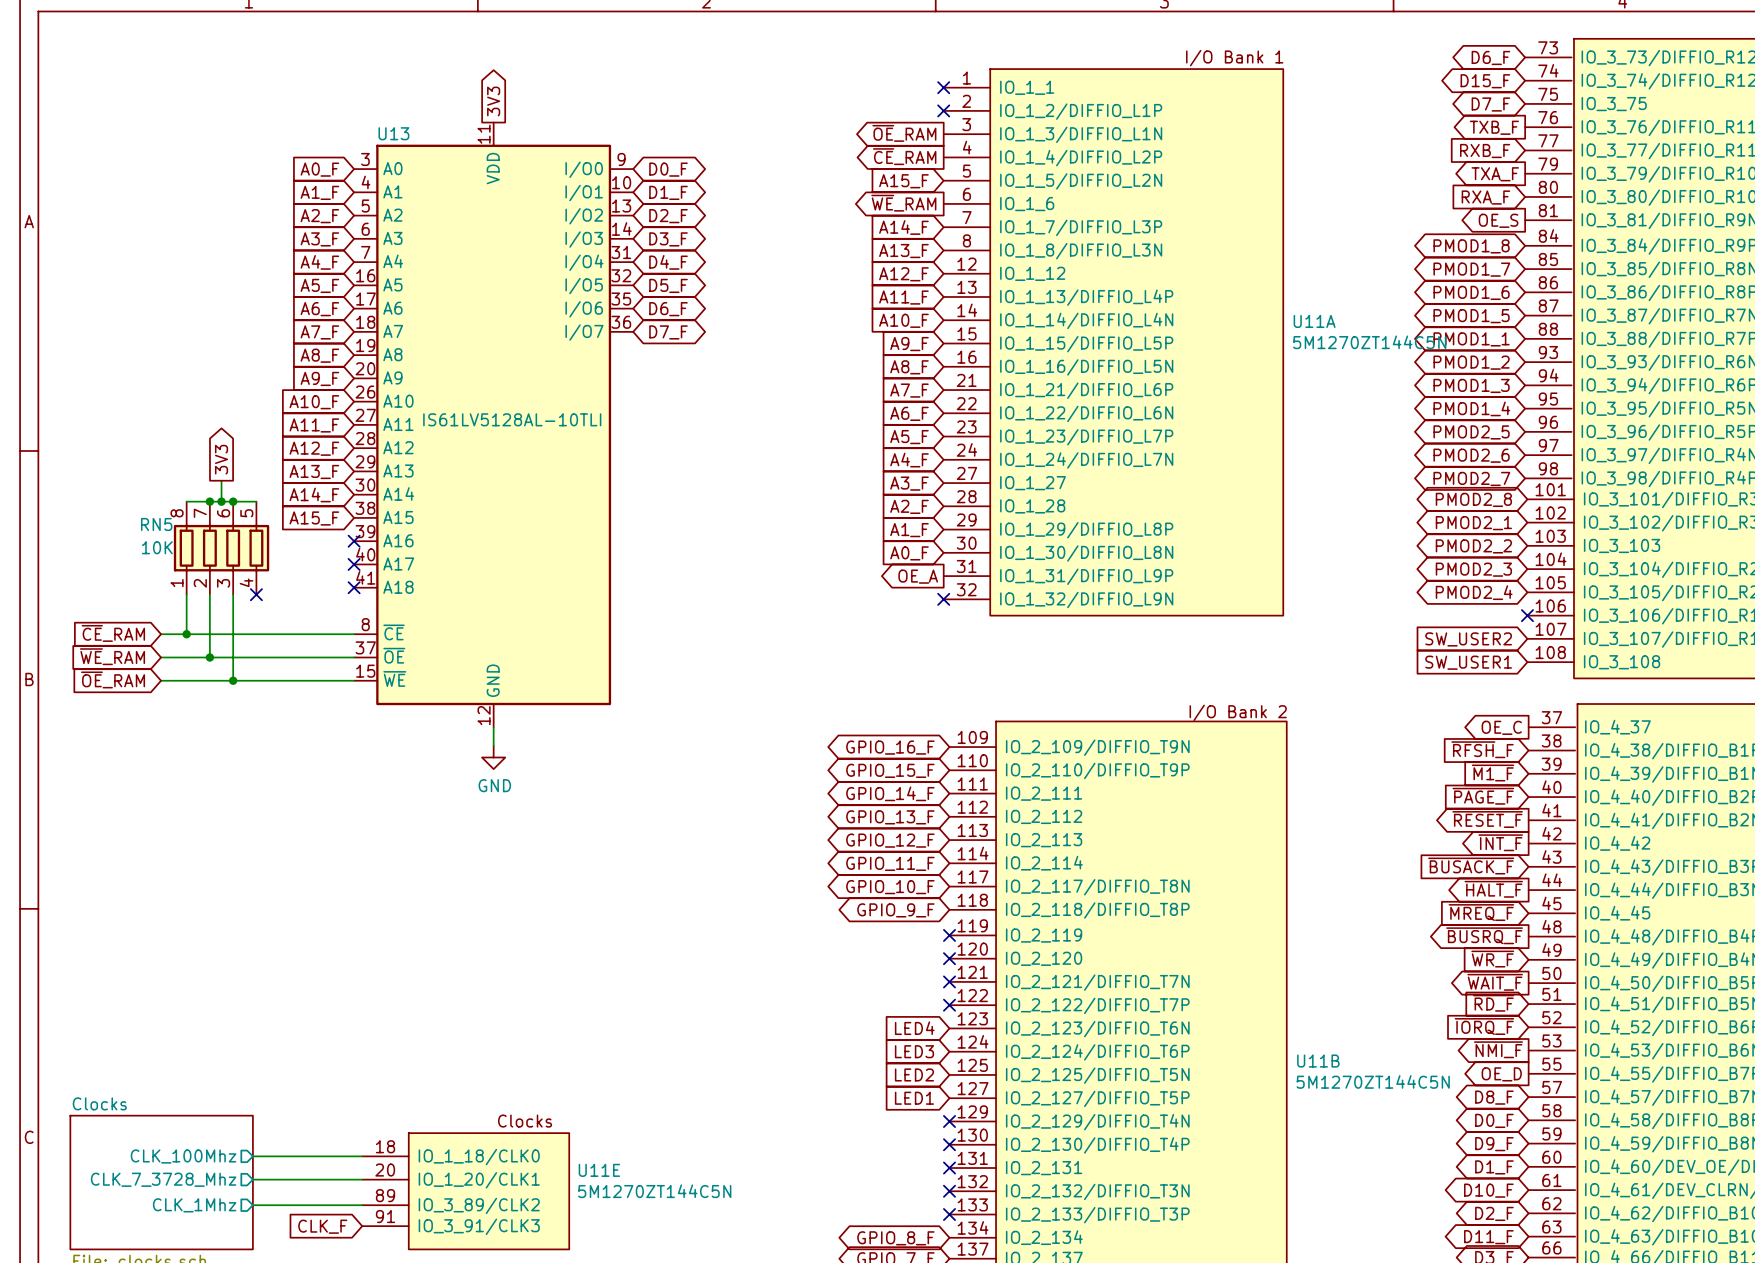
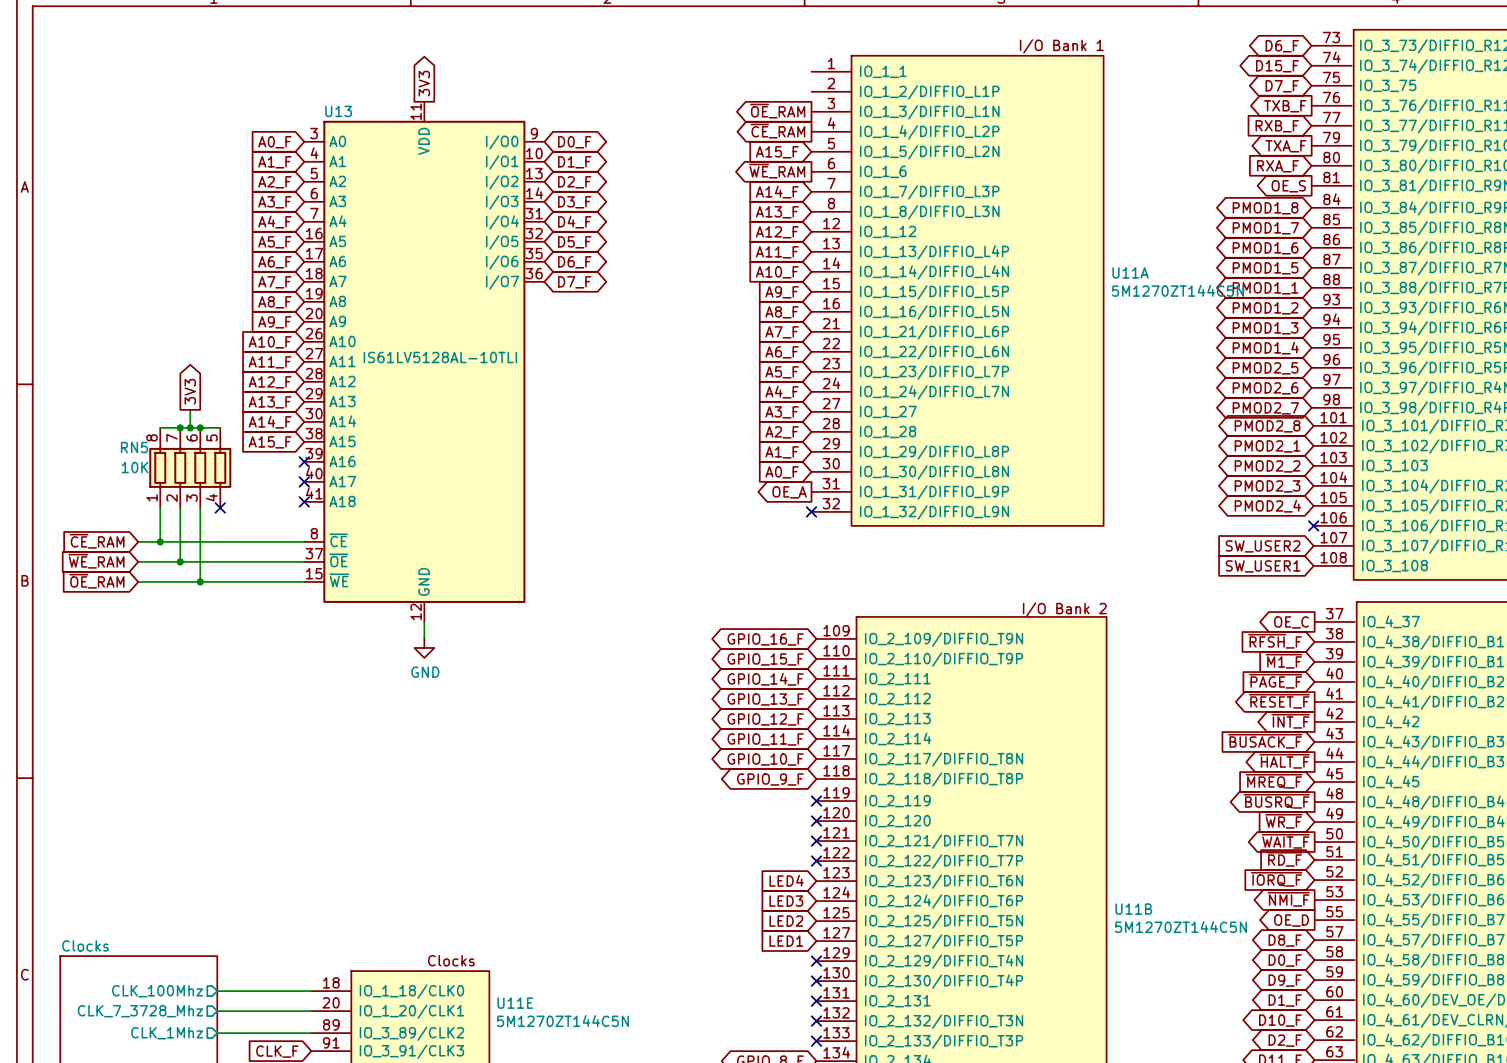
no-connect mark: (943, 87) -> none
no-connect mark: (943, 110) -> none

